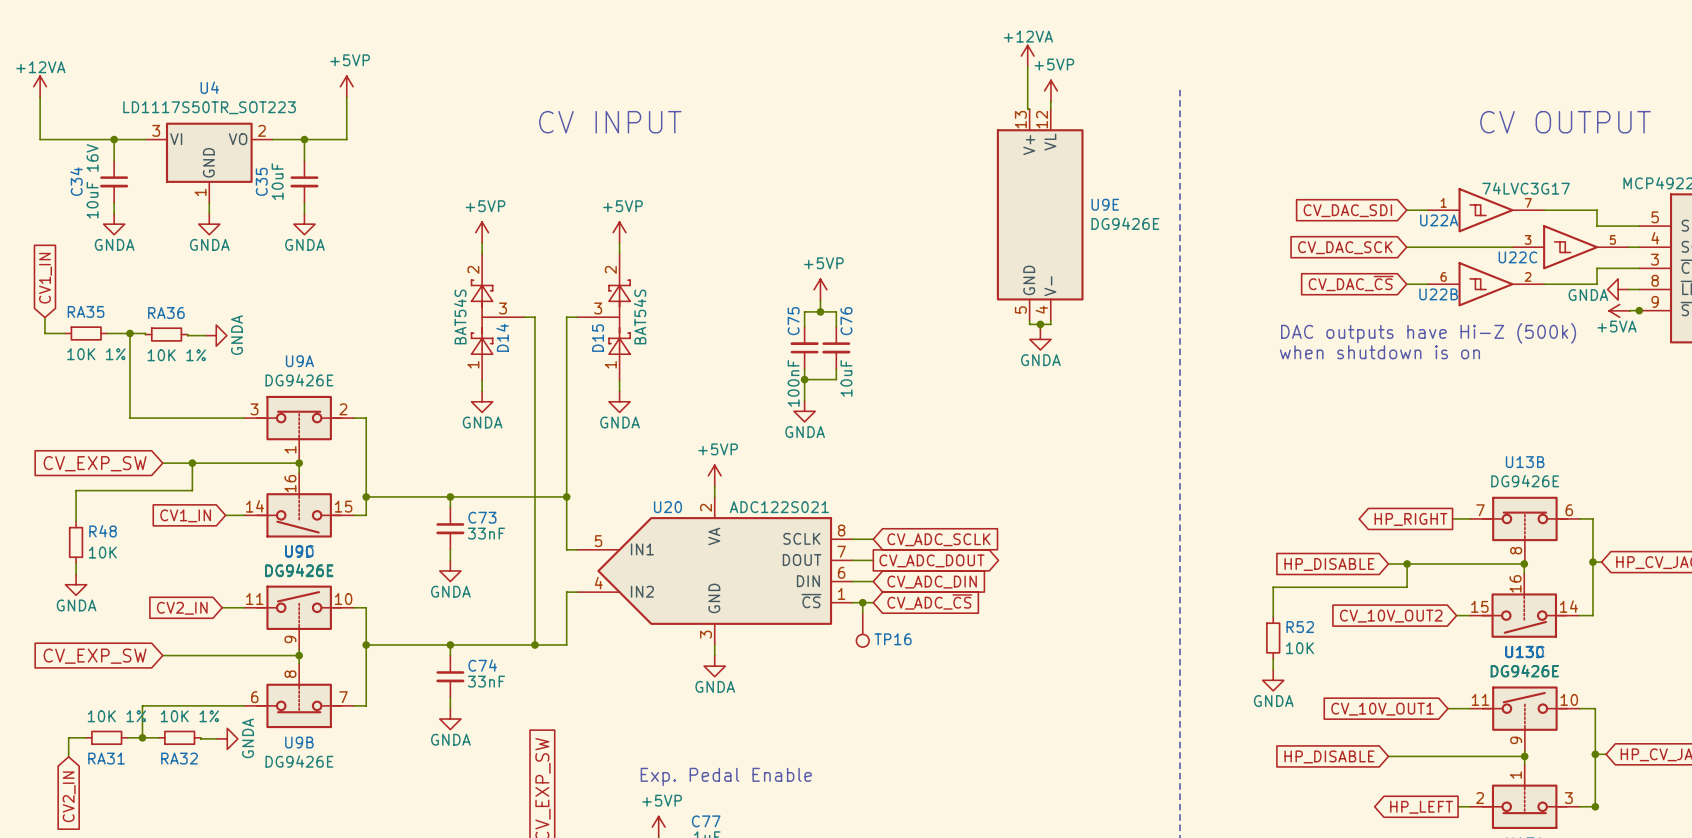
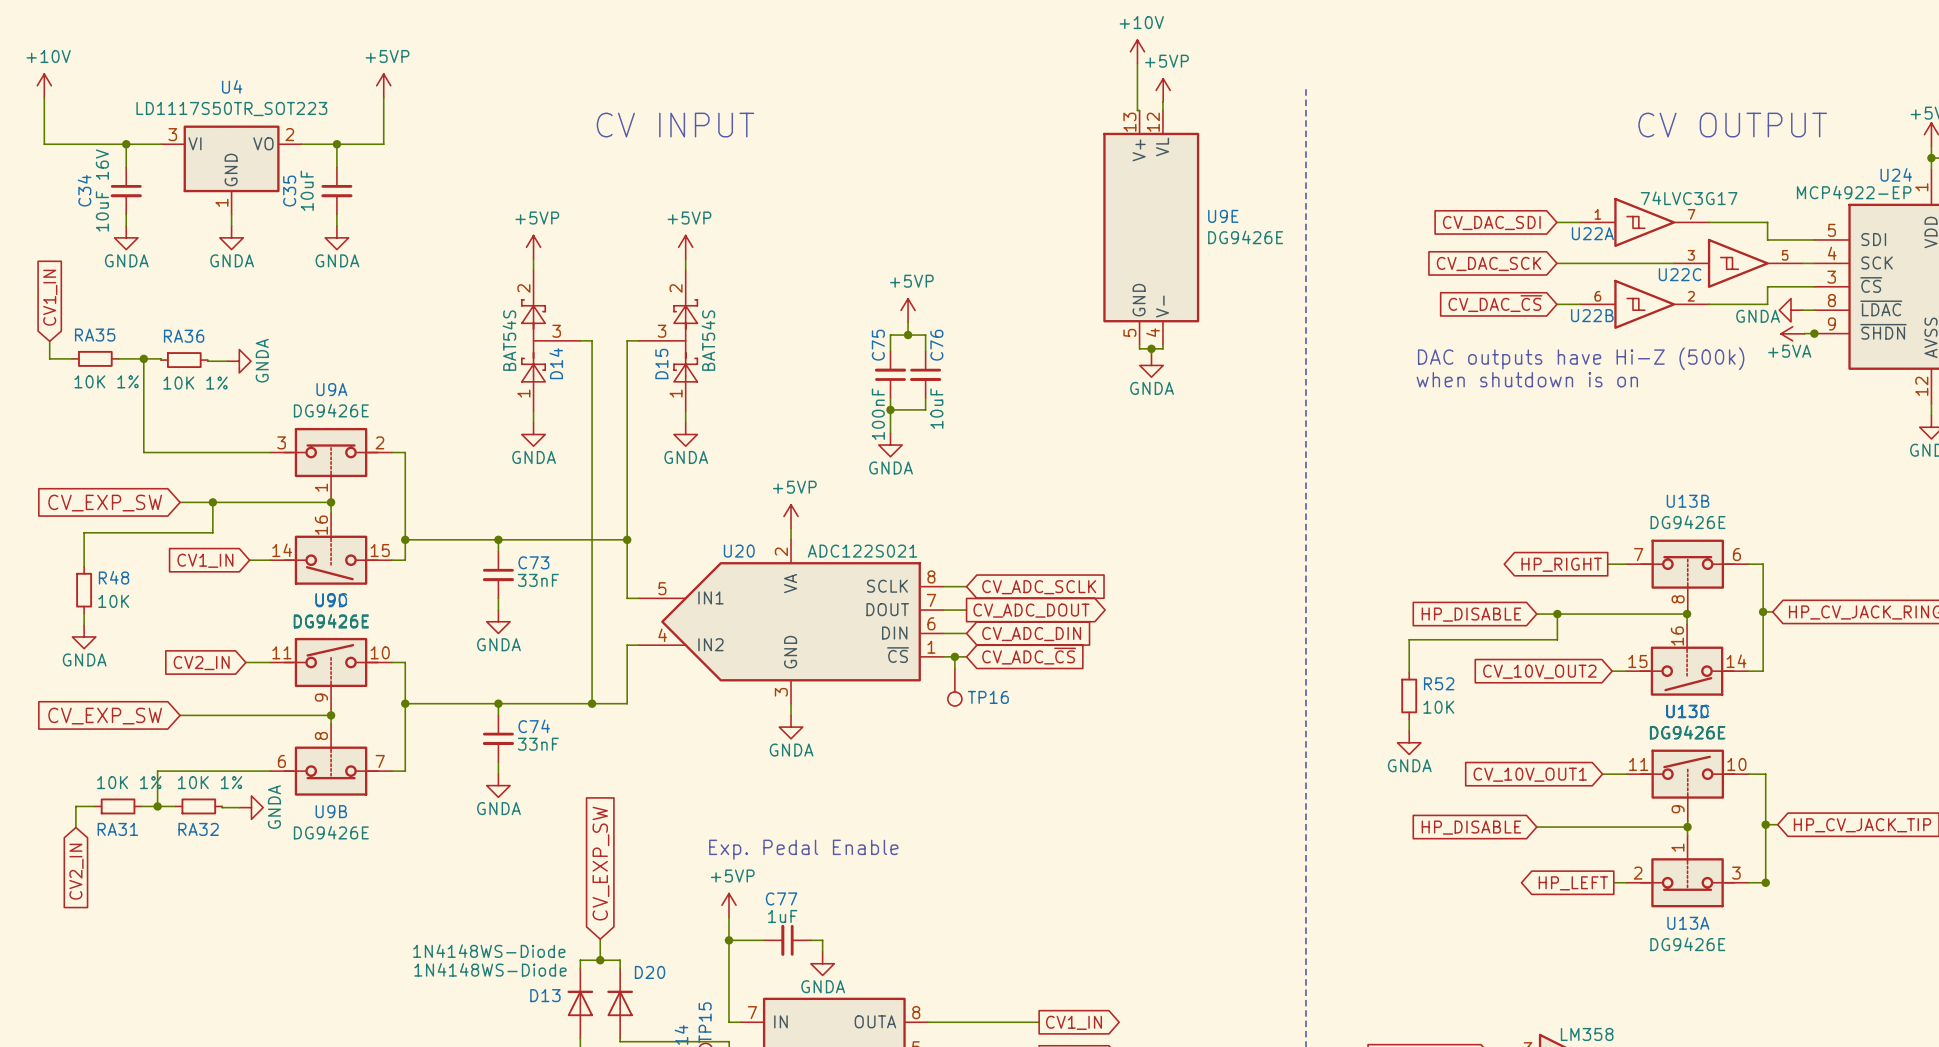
power symbol: +12VA (1027, 56) -> +10V (1137, 51)
power symbol: +12VA (40, 86) -> +10V (44, 85)

